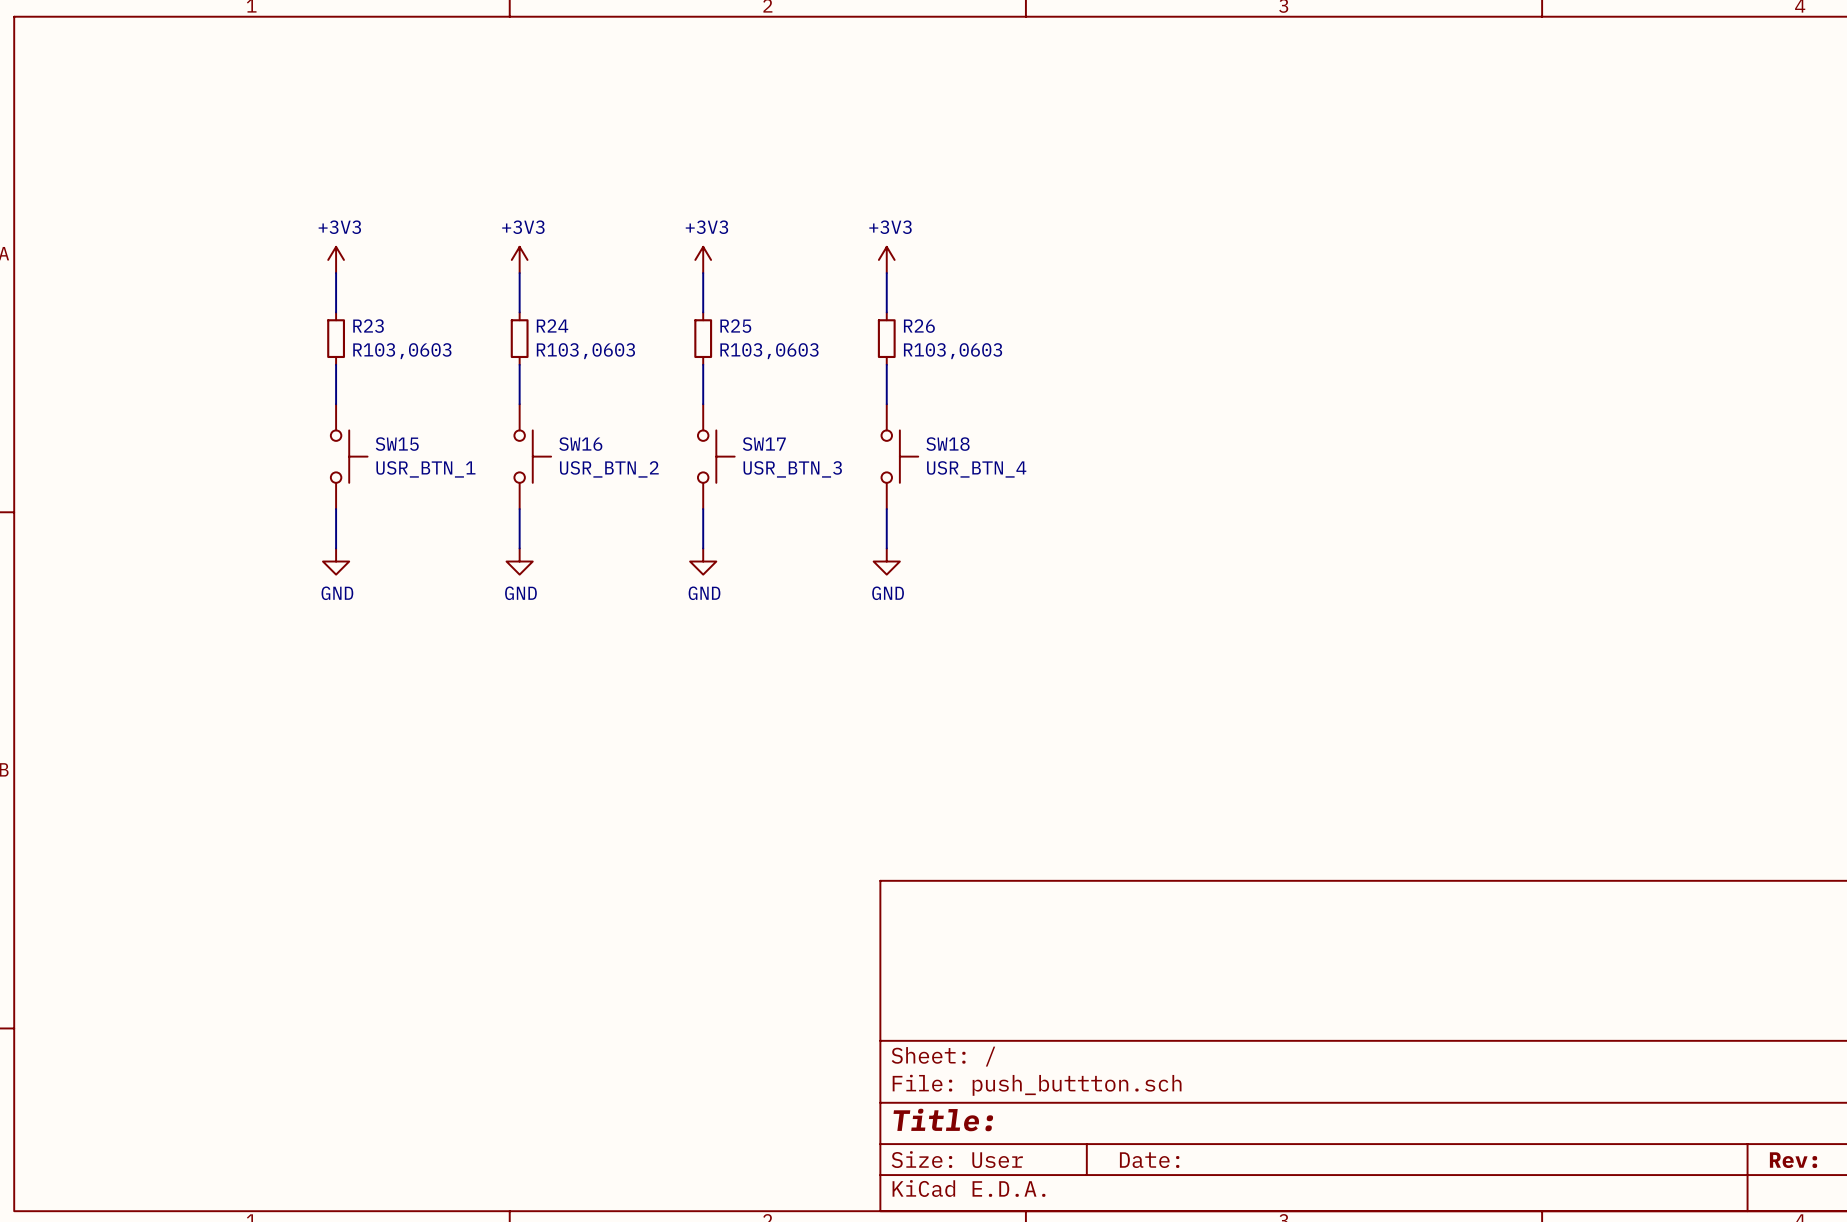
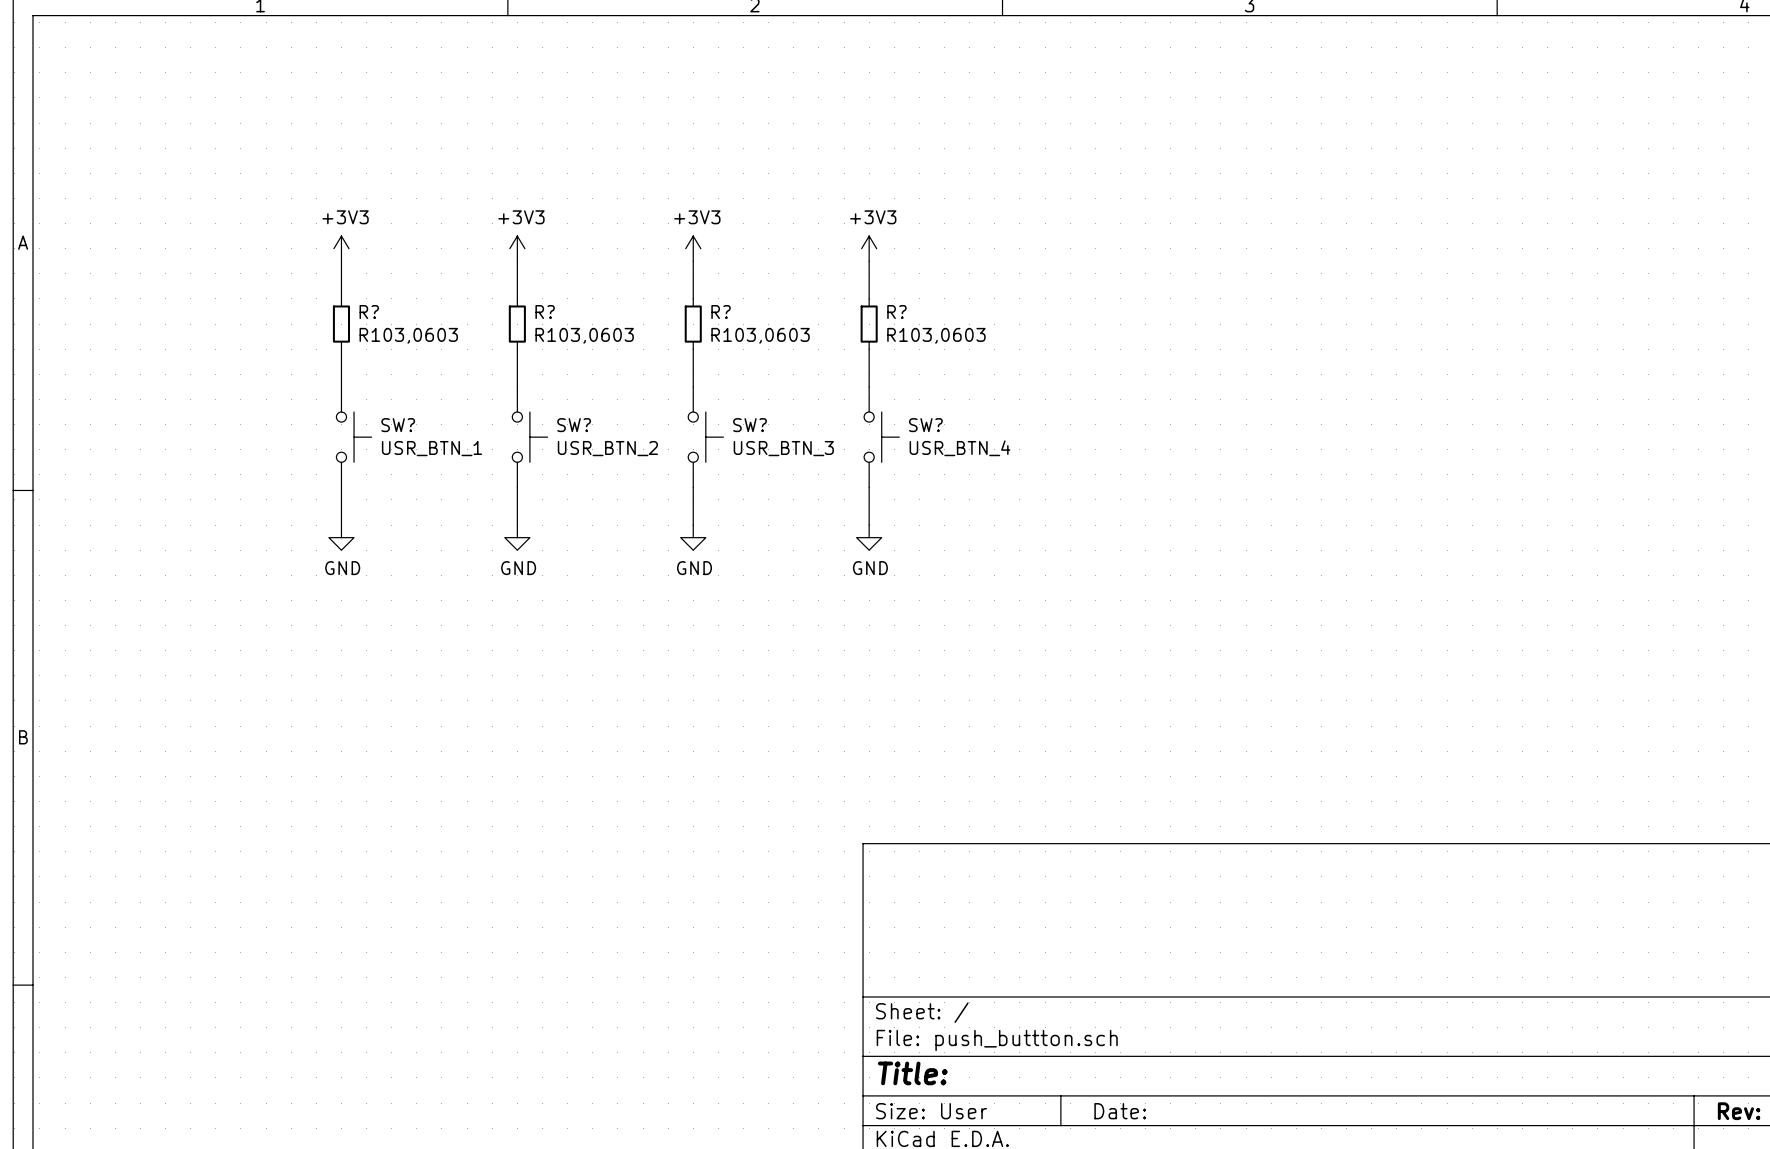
R24 name: R24 (552, 325) -> R? (545, 312)
R23 name: R23 (368, 326) -> R? (369, 312)
R25 name: R25 (735, 326) -> R? (721, 312)
R26 name: R26 (919, 326) -> R? (896, 312)
SW15 name: SW15 (397, 444) -> SW? (398, 425)
SW16 name: SW16 (580, 444) -> SW? (574, 425)
SW17 name: SW17 (764, 444) -> SW? (749, 425)
SW18 name: SW18 (948, 444) -> SW? (925, 425)

